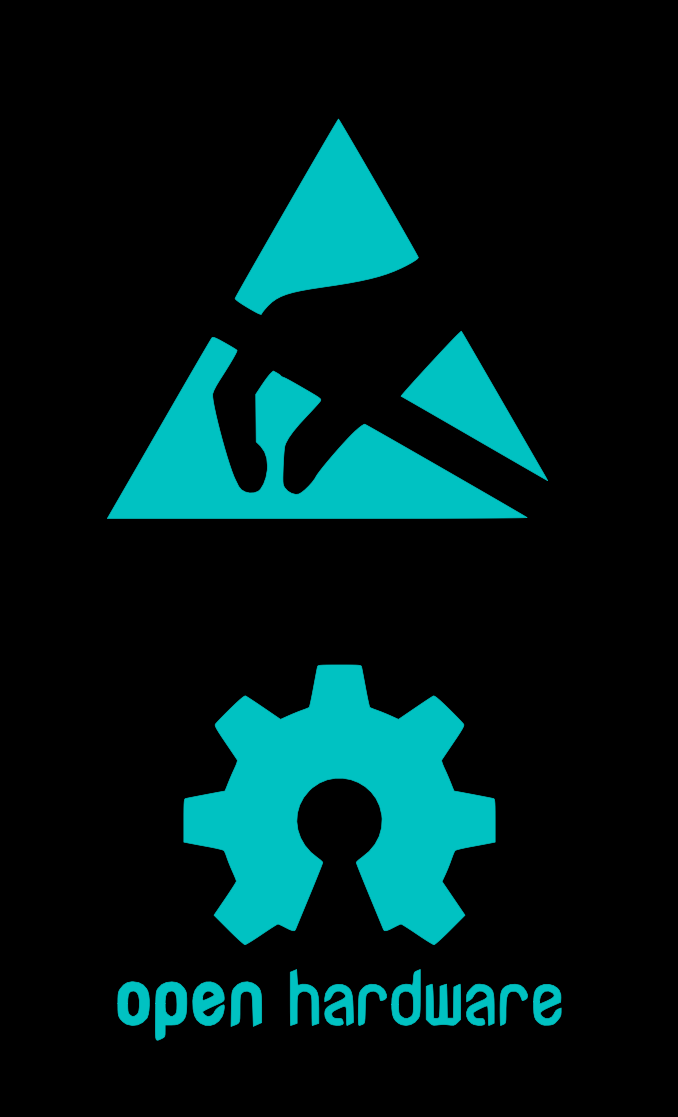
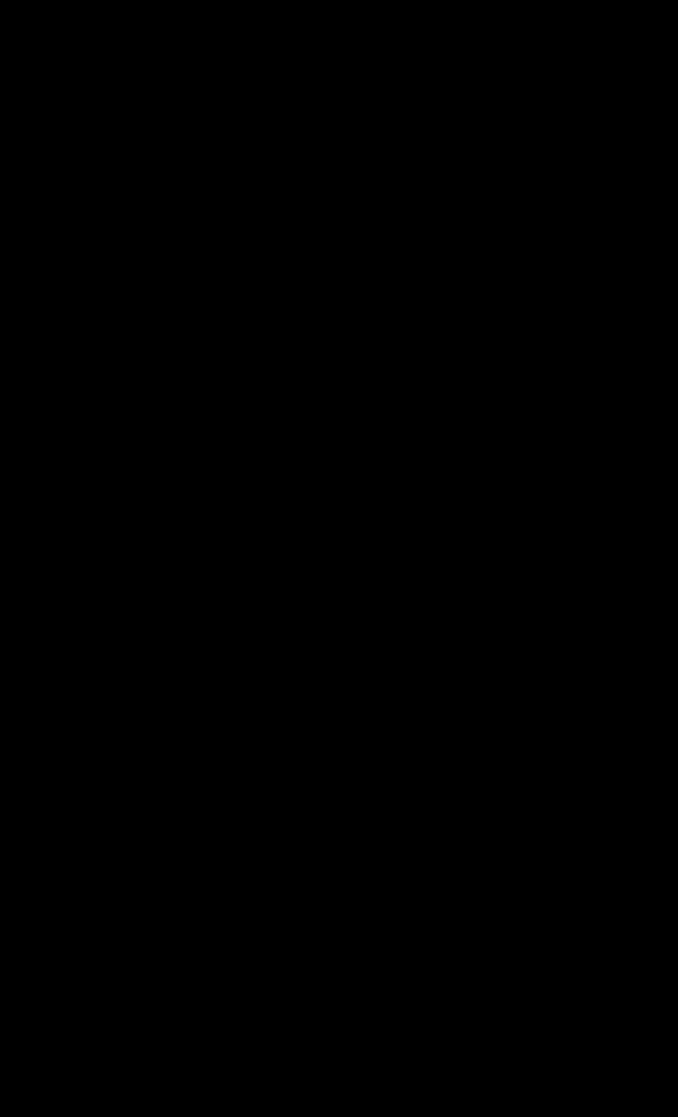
drawing: [106, 118, 548, 519] -> none
drawing: [117, 664, 562, 1041] -> none

